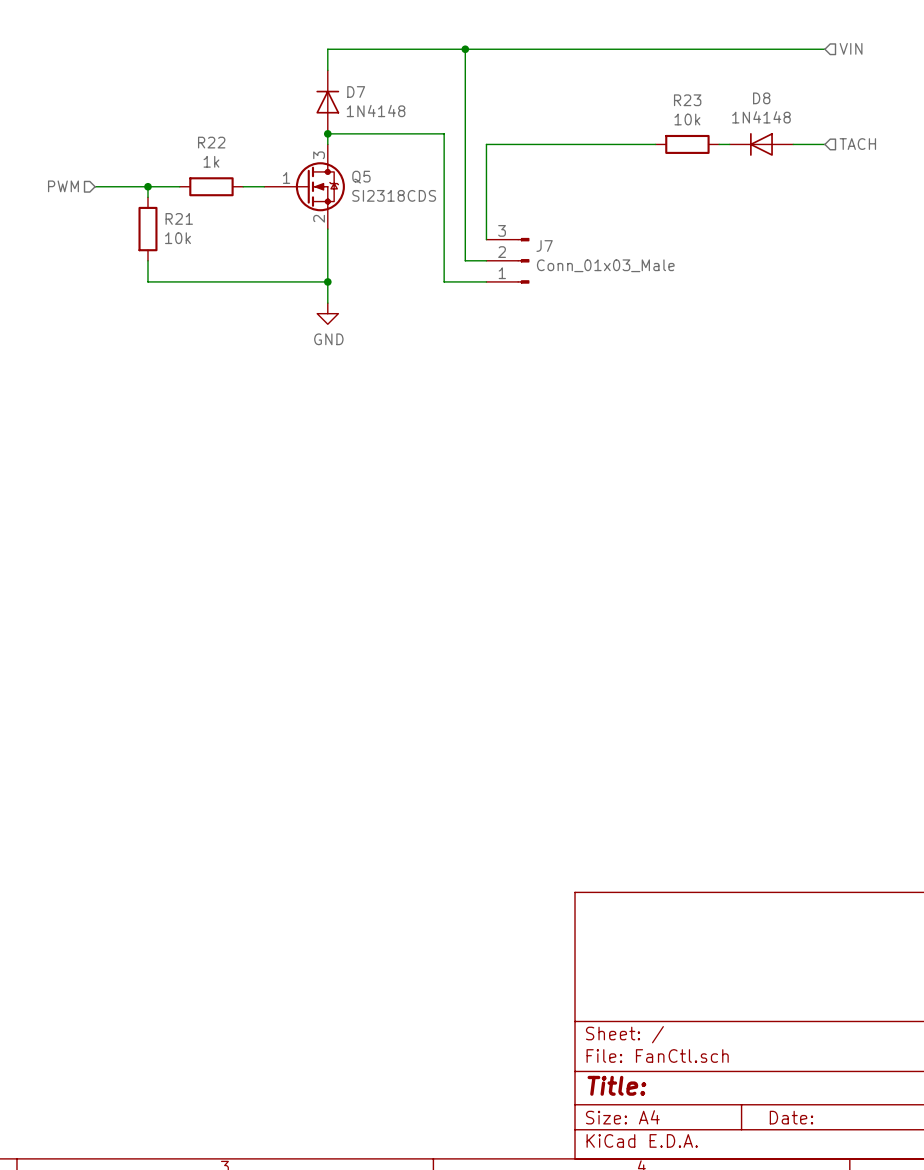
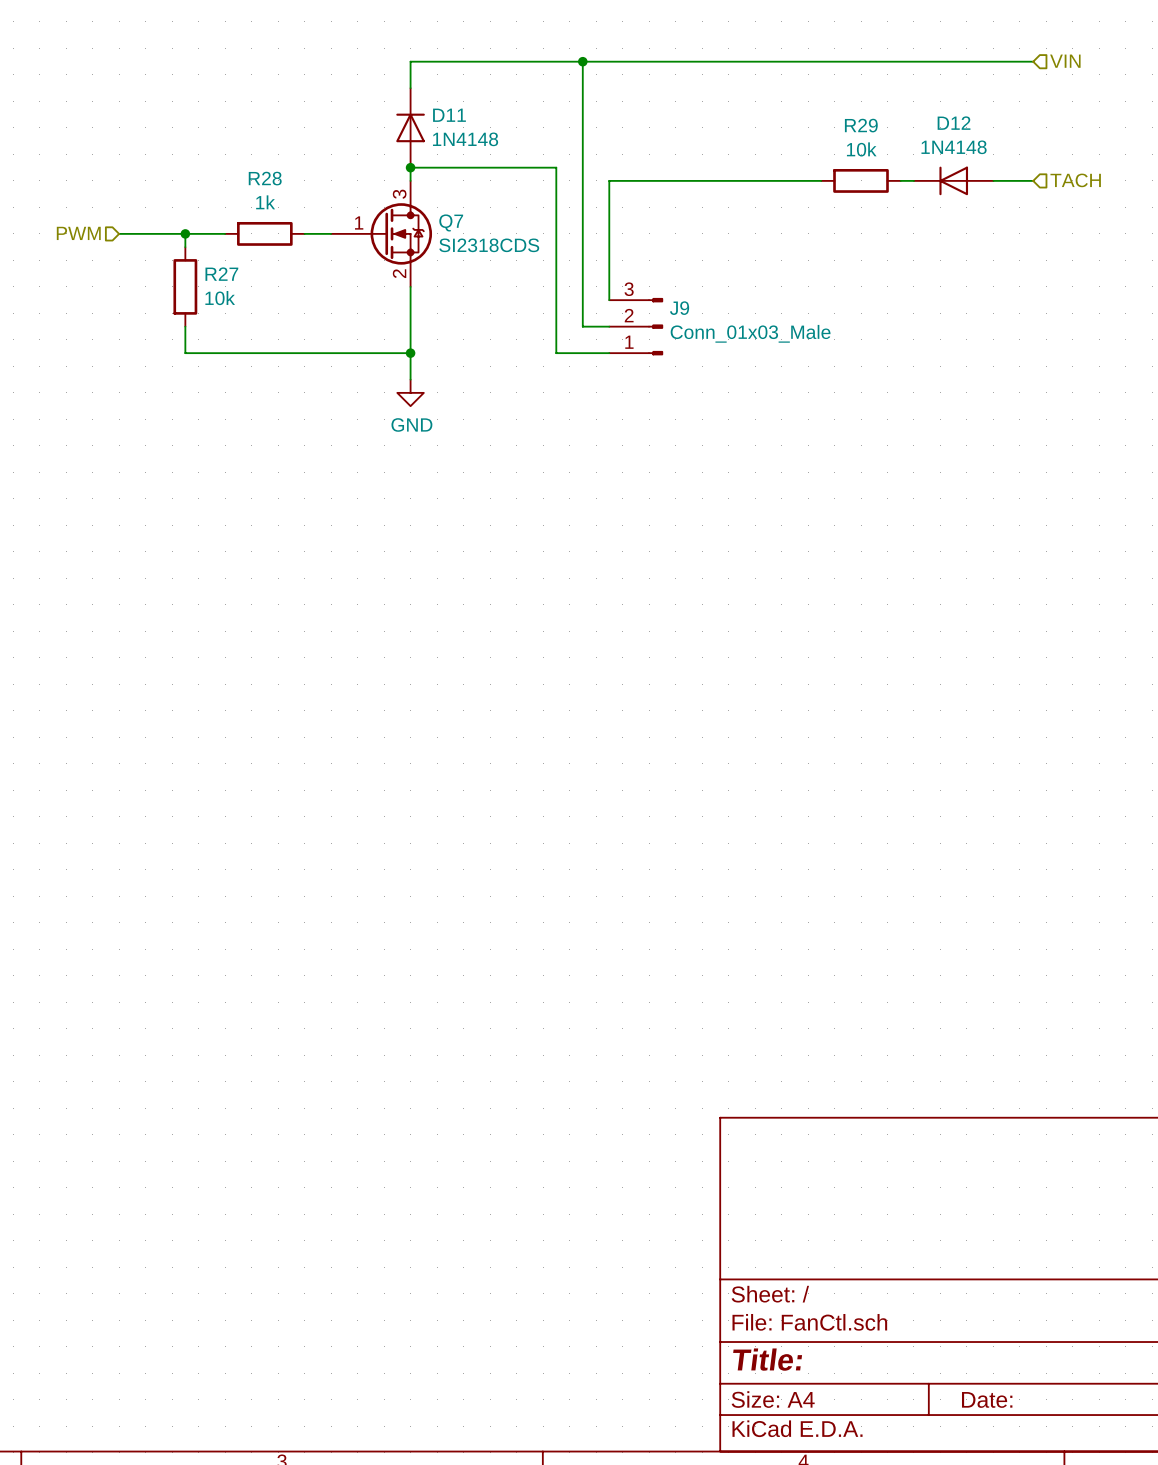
D7 name: D7 (356, 92) -> D11 (449, 115)
D8 name: D8 (761, 98) -> D12 (954, 123)
R23 name: R23 (687, 100) -> R29 (861, 125)
R22 name: R22 (211, 142) -> R28 (265, 178)
Q5 name: Q5 (361, 177) -> Q7 (451, 222)
R21 name: R21 (179, 218) -> R27 (221, 274)
J7 name: J7 (544, 246) -> J9 (679, 308)

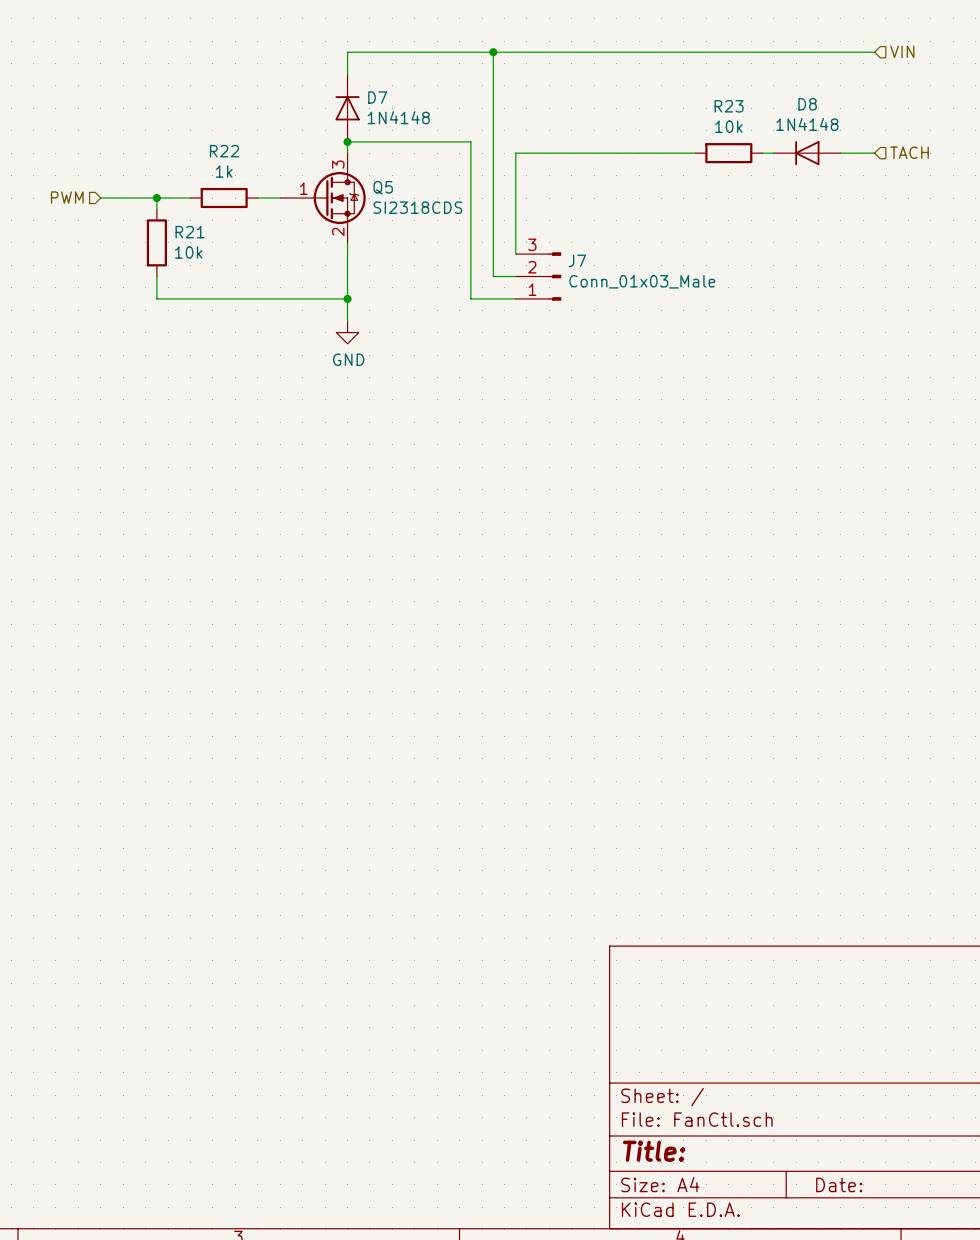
D11 name: D11 (449, 115) -> D7 (377, 97)
D12 name: D12 (954, 123) -> D8 (807, 104)
R29 name: R29 (861, 125) -> R23 (729, 106)
R28 name: R28 (265, 178) -> R22 (224, 151)
Q7 name: Q7 (451, 222) -> Q5 (383, 187)
R27 name: R27 (221, 274) -> R21 (190, 232)
J9 name: J9 (679, 308) -> J7 (577, 260)

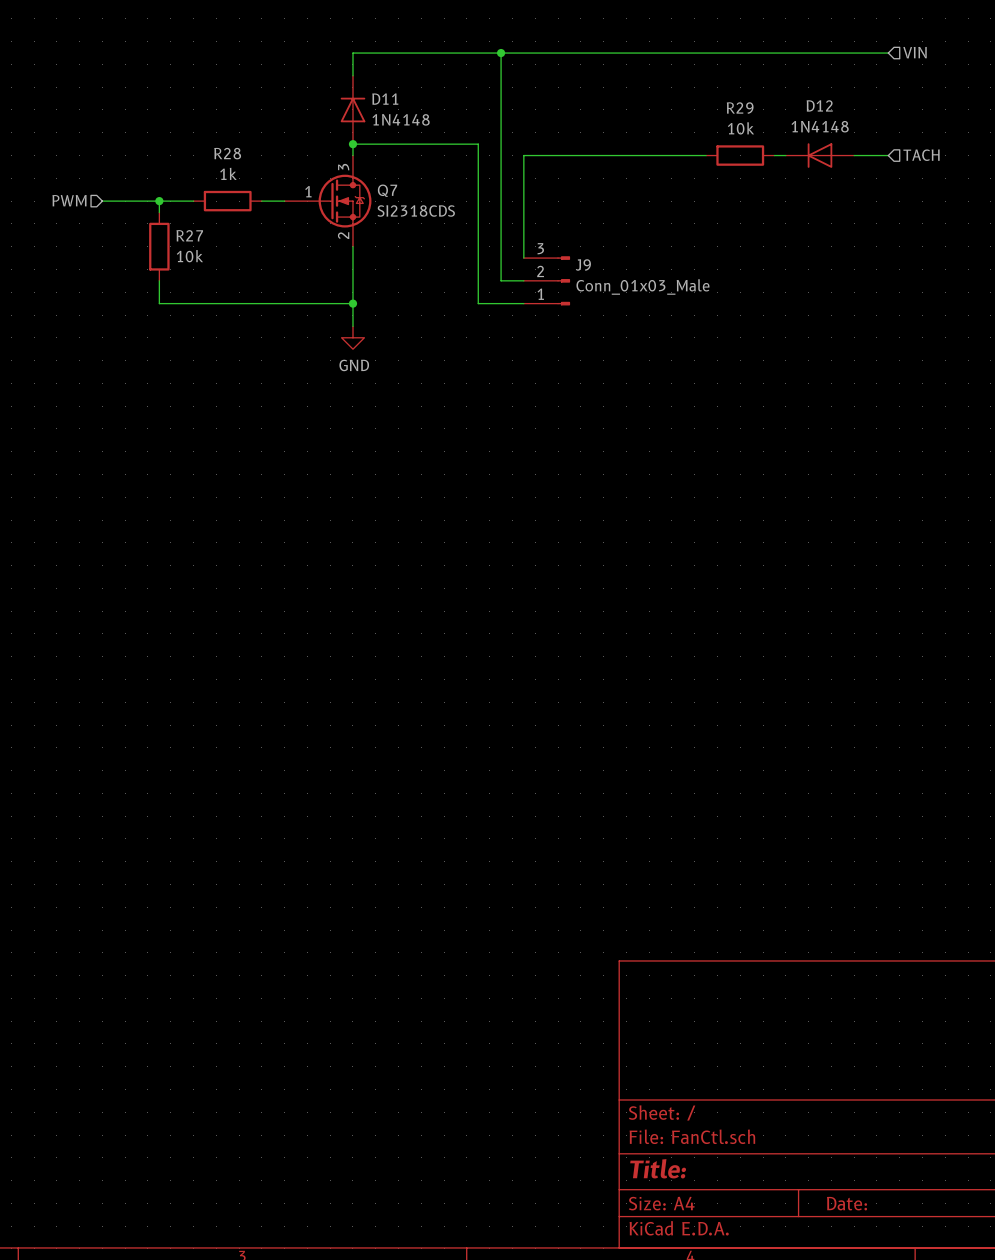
D7 name: D7 (377, 97) -> D11 (385, 99)
D8 name: D8 (807, 104) -> D12 (819, 105)
R23 name: R23 (729, 106) -> R29 (740, 108)
R22 name: R22 (224, 151) -> R28 (227, 153)
Q5 name: Q5 (383, 187) -> Q7 (387, 190)
R21 name: R21 (190, 232) -> R27 (189, 235)
J7 name: J7 (577, 260) -> J9 (583, 264)

